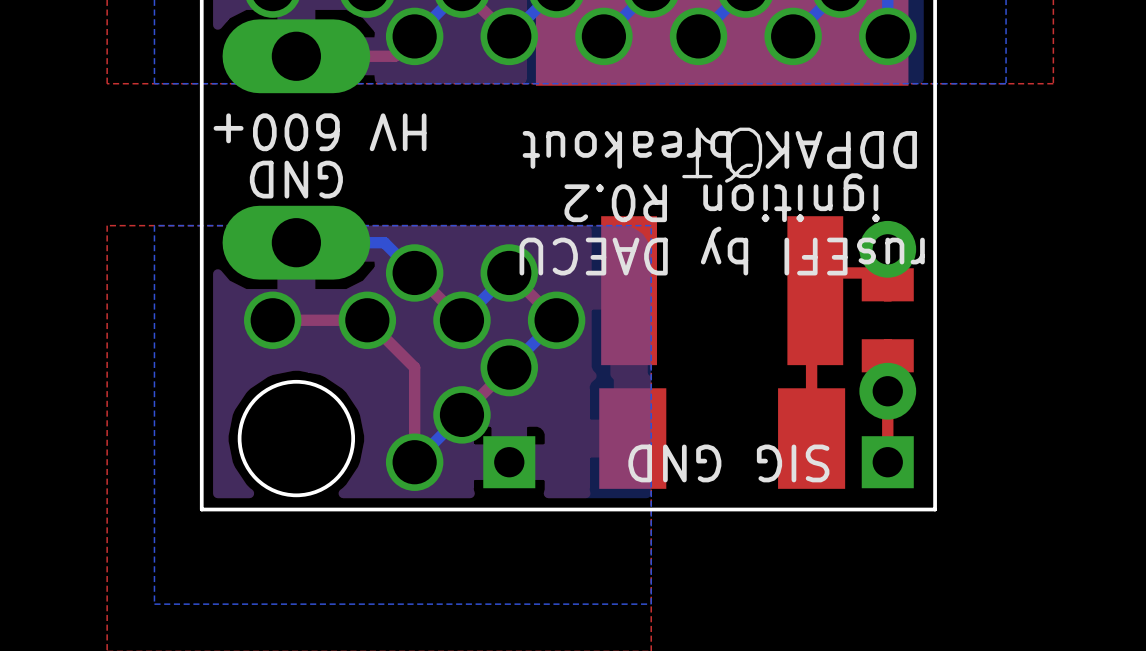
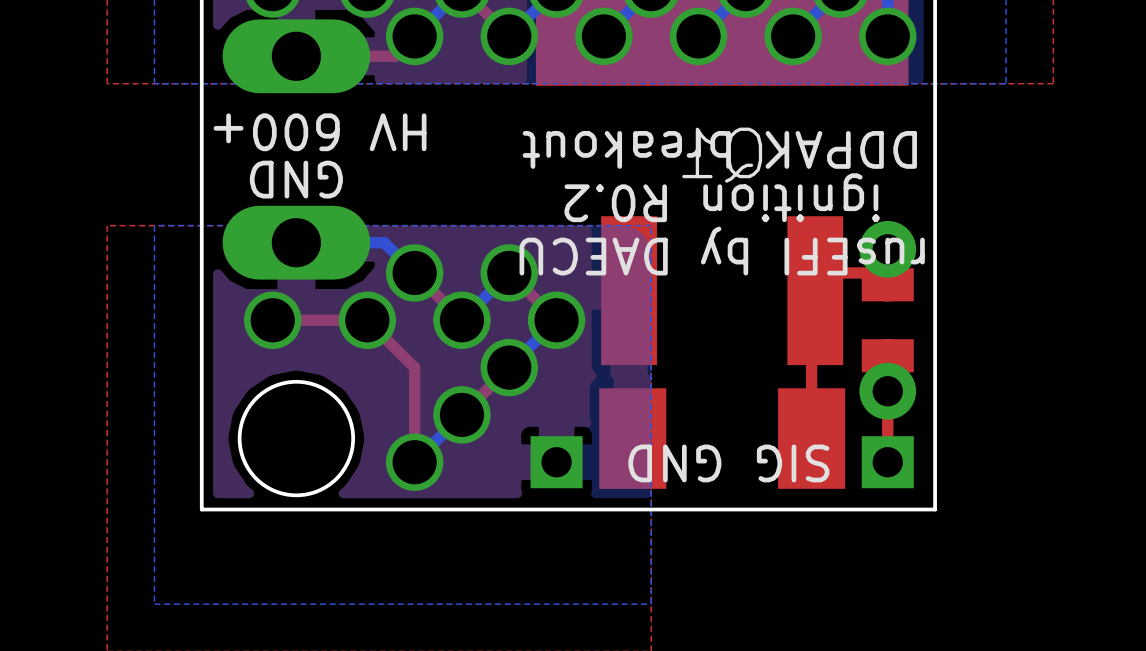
part position: (509, 462) -> (556, 462)

